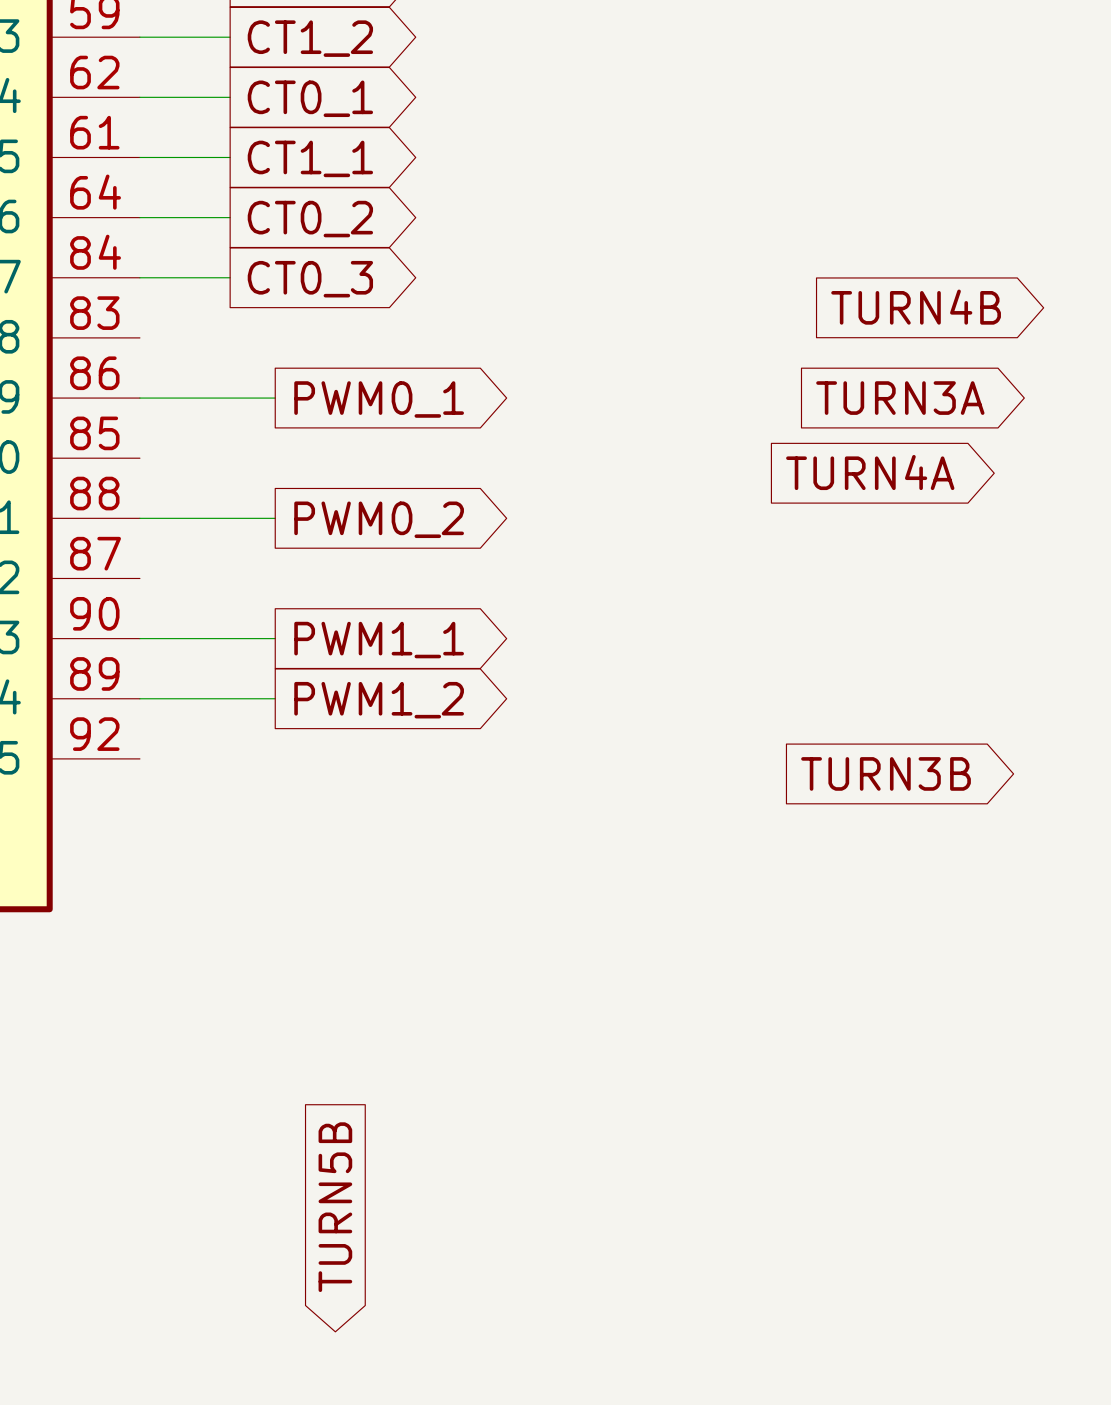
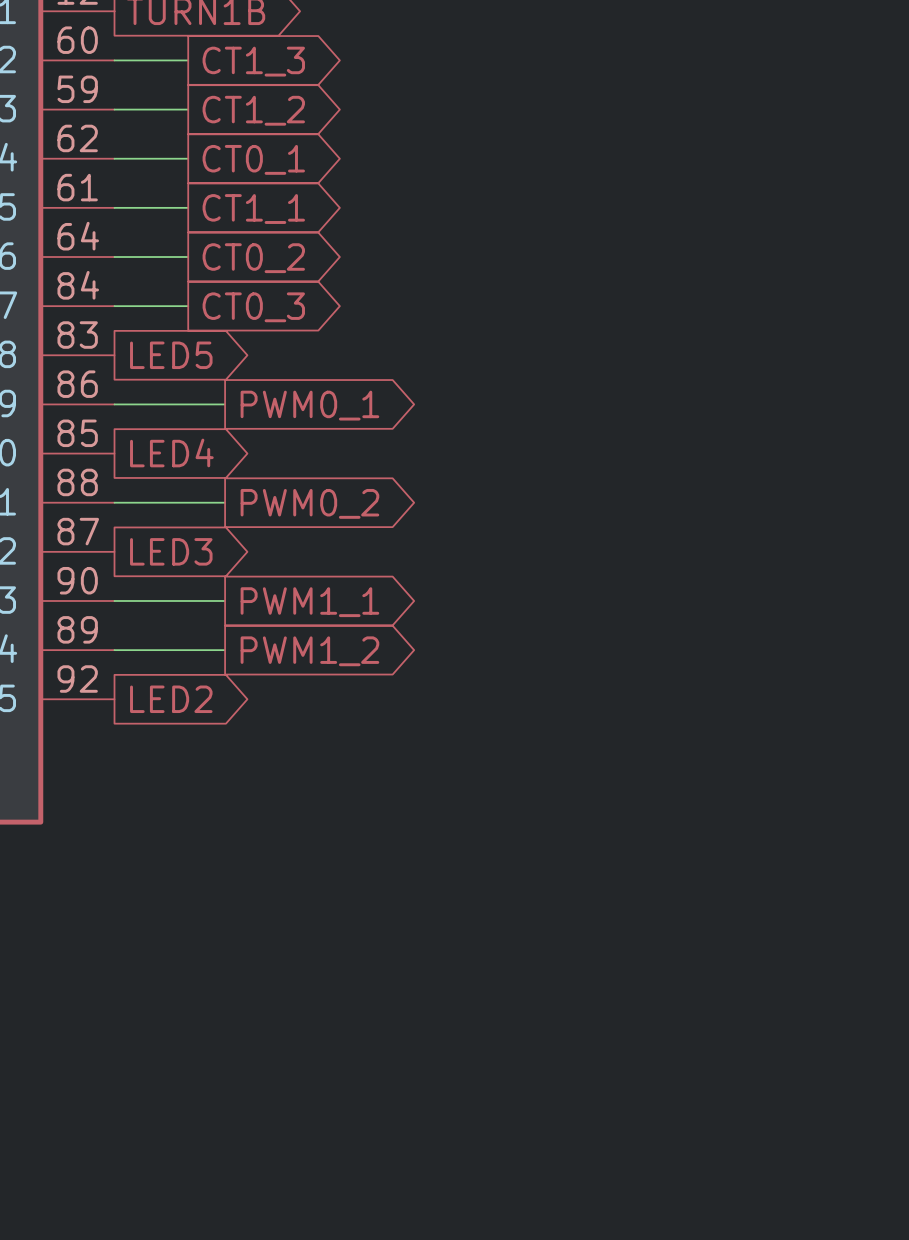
global label: TURN4B (916, 307) -> none
global label: none -> LED5 (171, 355)
global label: TURN3A (900, 398) -> none
global label: none -> LED4 (171, 452)
global label: TURN4A (870, 472) -> none
global label: none -> LED3 (171, 551)
global label: none -> LED2 (171, 699)
global label: TURN3B (886, 773) -> none
global label: TURN5B (335, 1207) -> none

